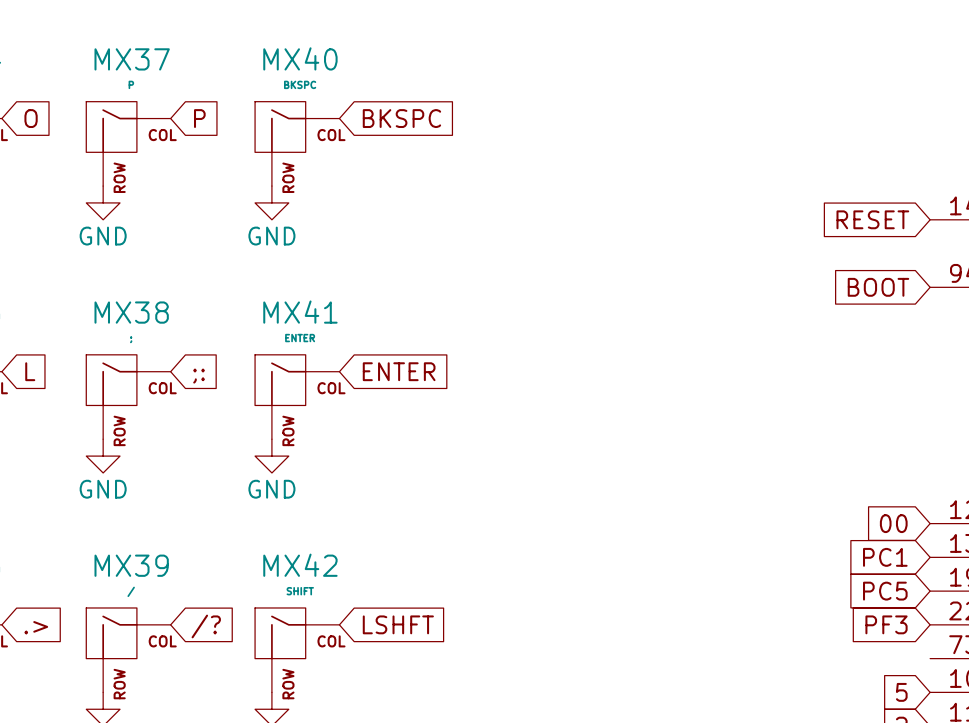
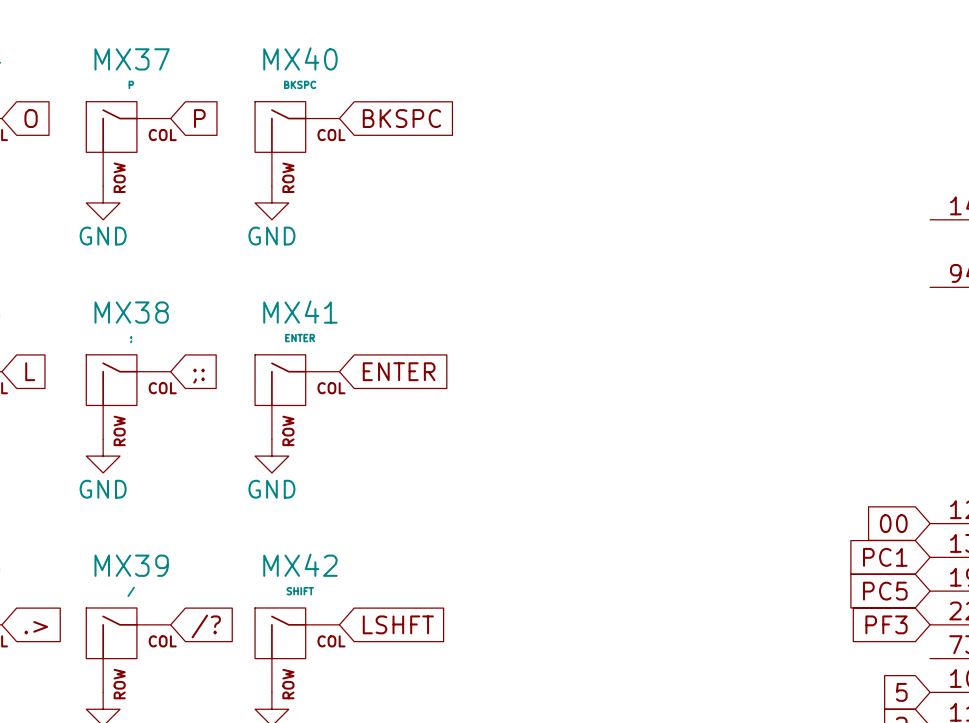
global label: RESET (872, 219) -> none
global label: BOOT (878, 287) -> none

